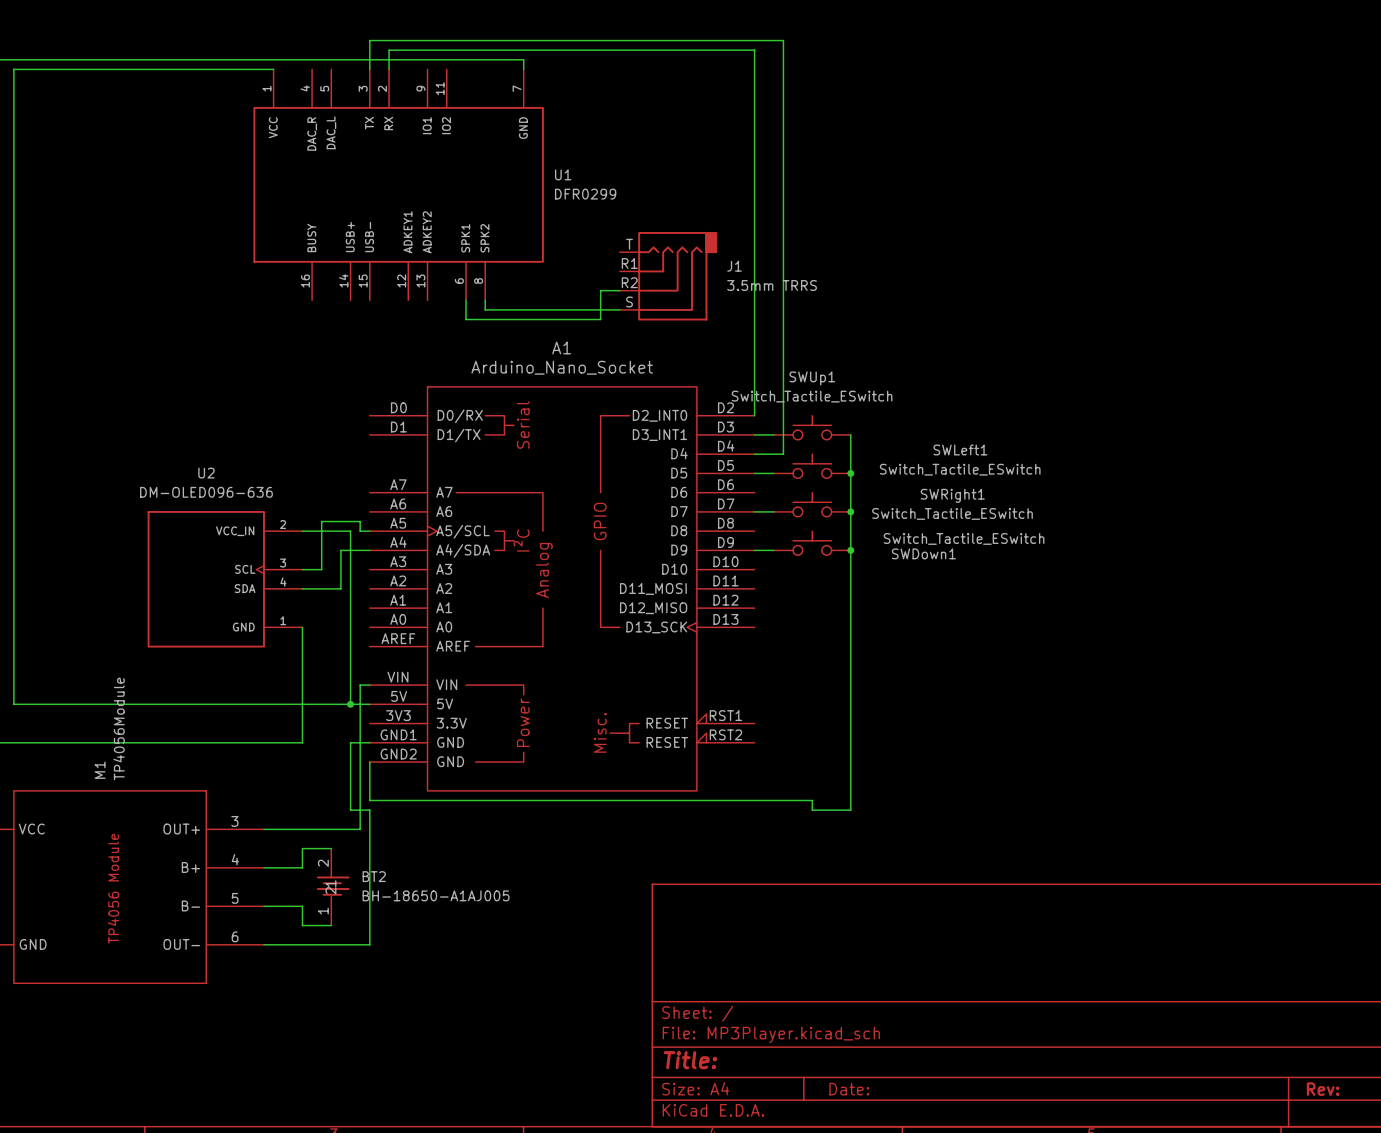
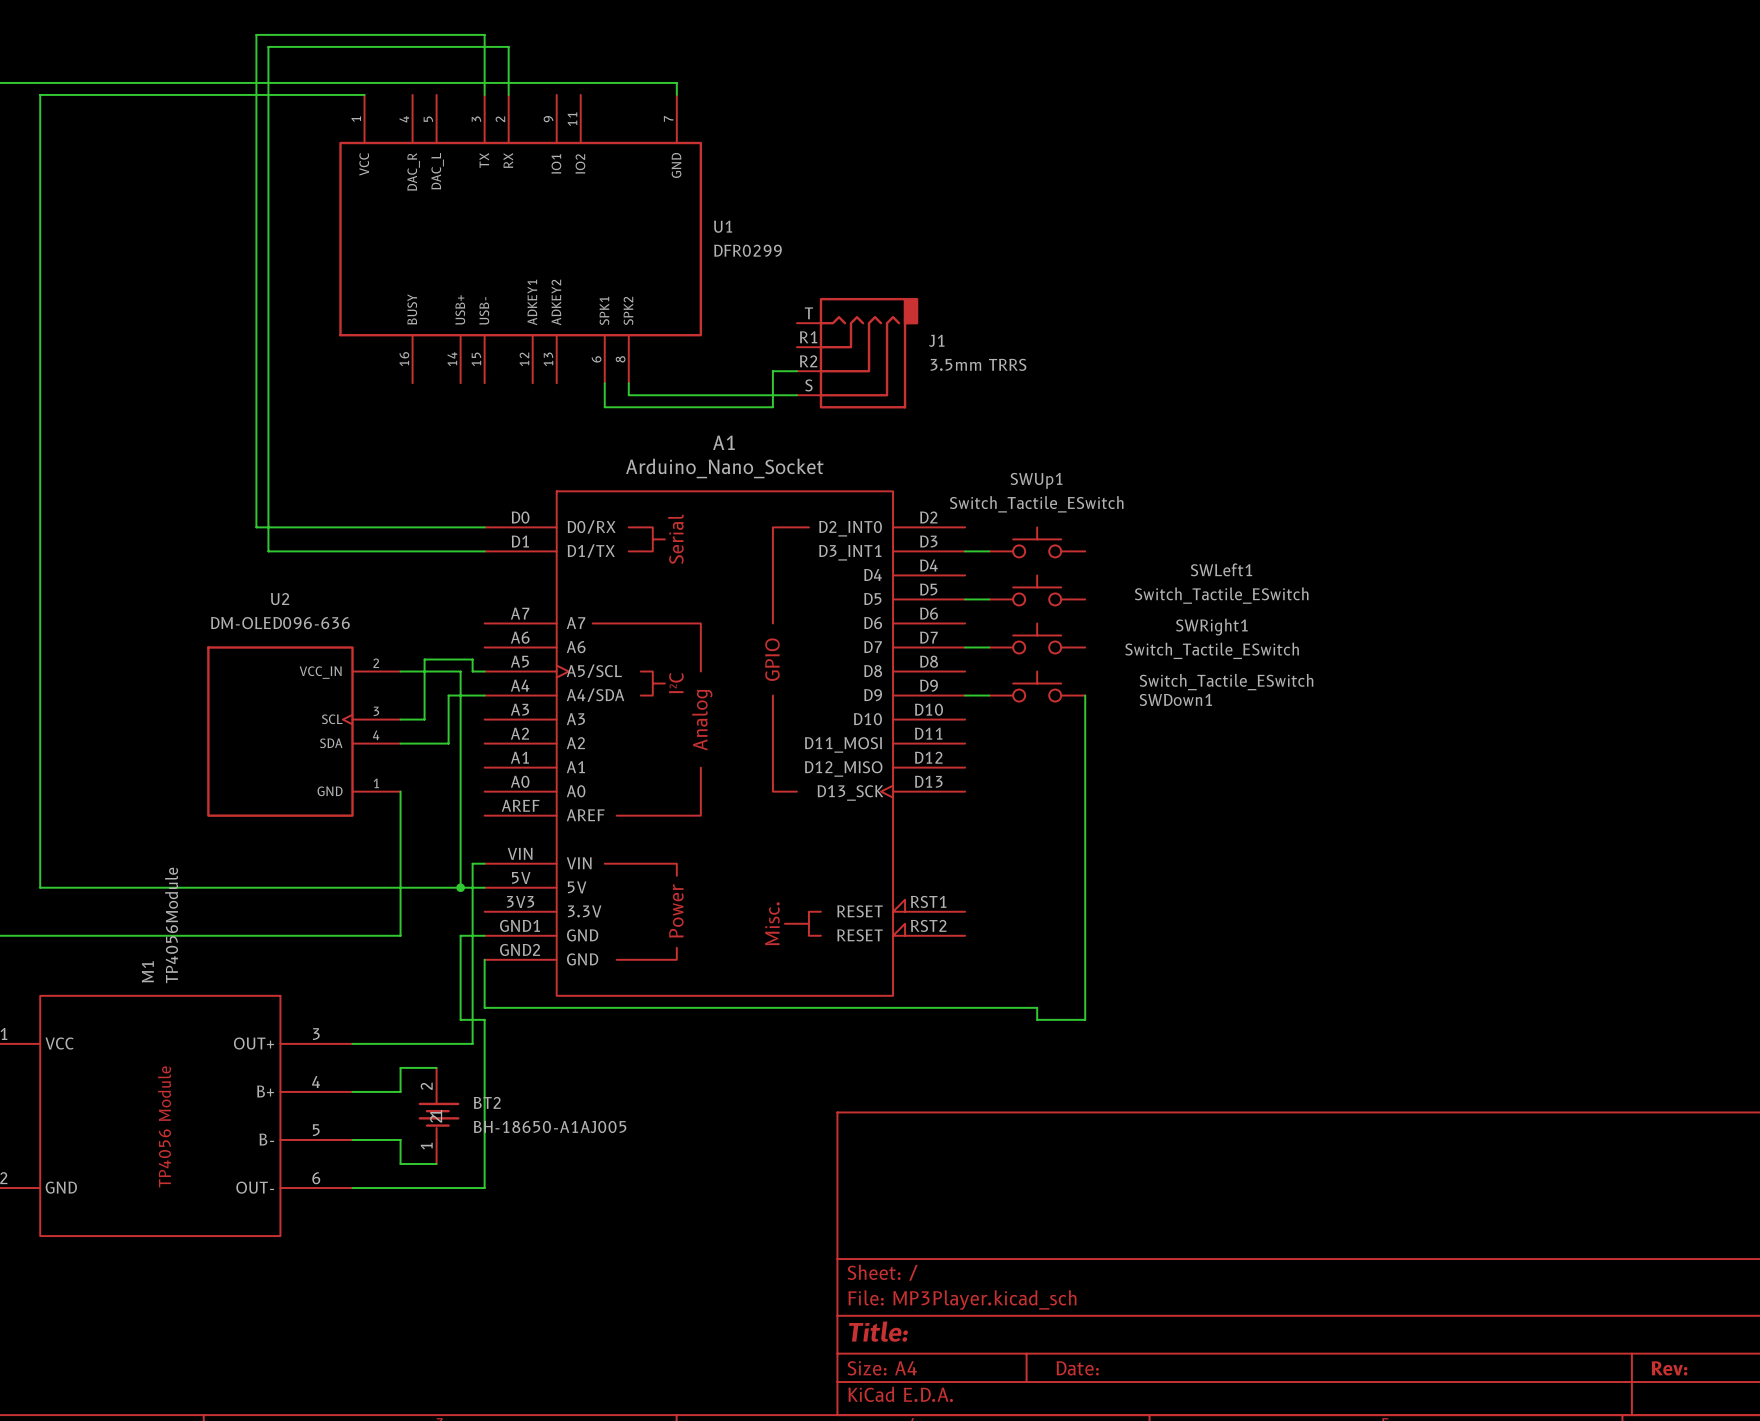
wire: (369, 40) (783, 40) (783, 454) (754, 454) -> (484, 58) (484, 34) (256, 34) (256, 527) (484, 527)
wire: (389, 50) (754, 50) (754, 415) -> (508, 70) (508, 46) (268, 46) (268, 551) (484, 551)
wire: (850, 434) (850, 550) -> none
junction: (850, 473) -> none
junction: (850, 511) -> none
junction: (850, 550) -> none

